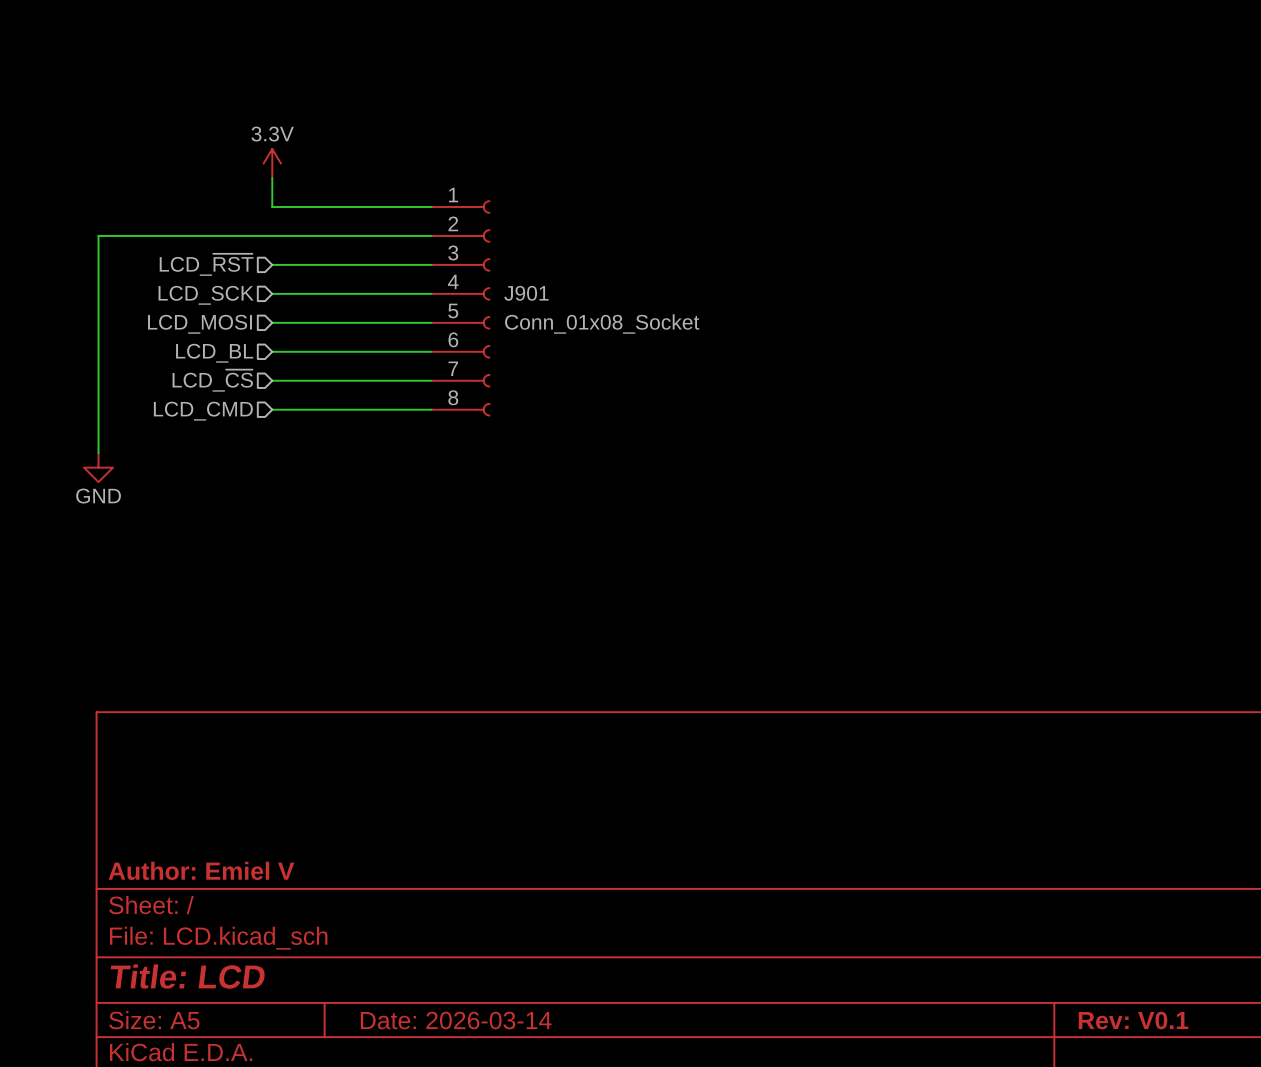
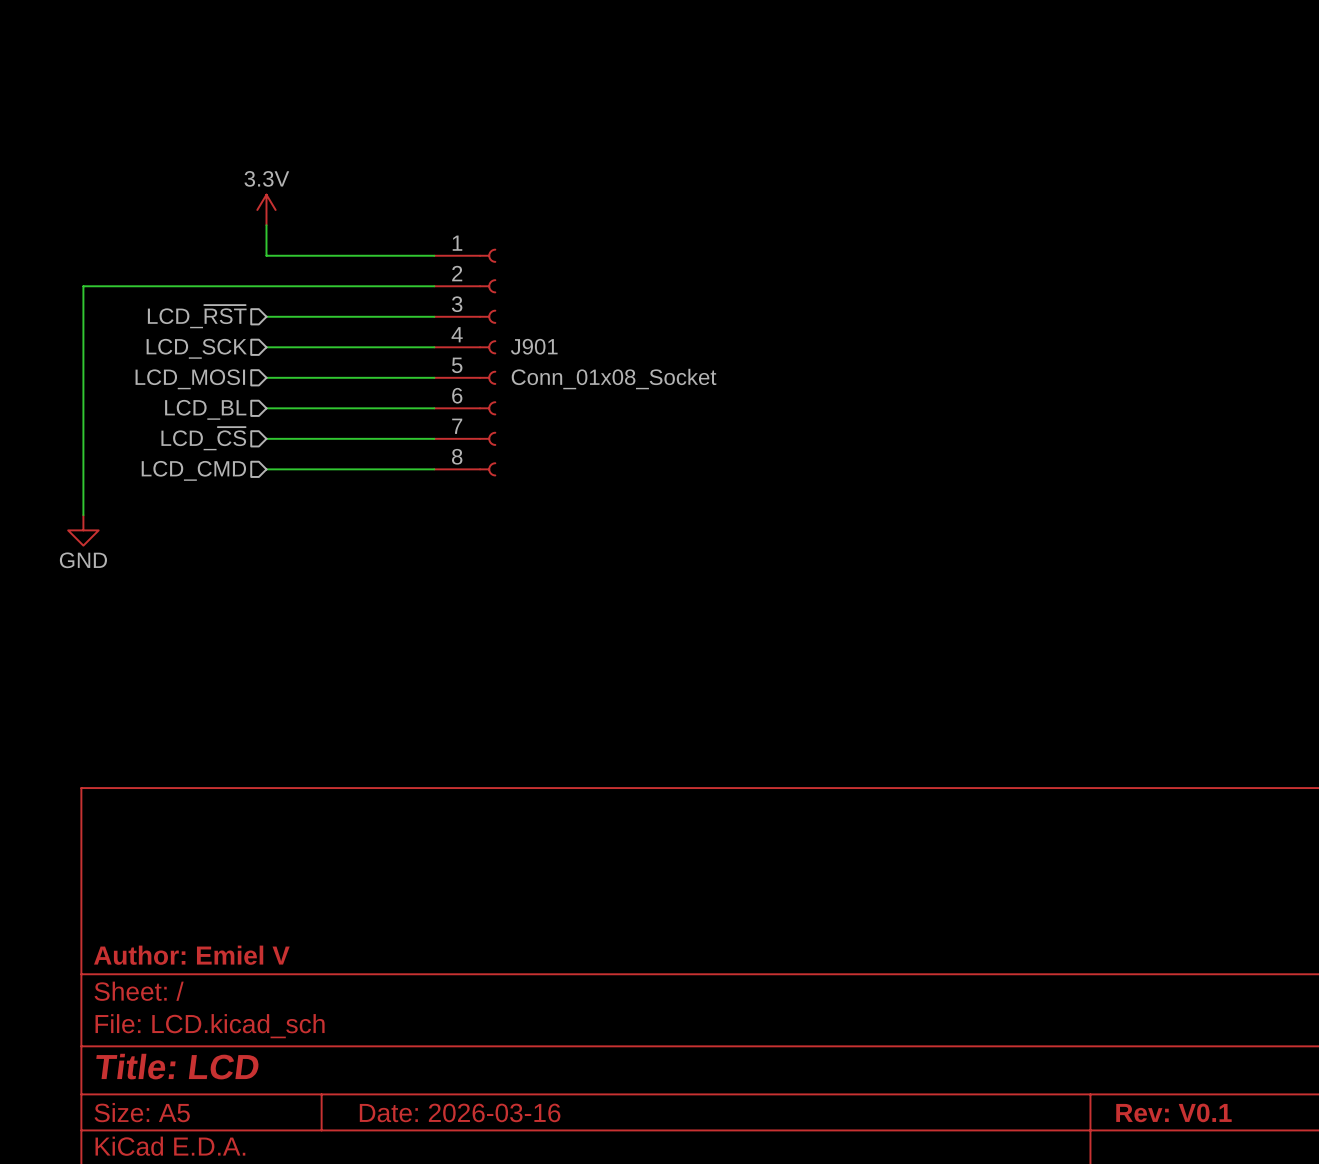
title block: Date: 2026-03-14 (456, 1020) -> Date: 2026-03-16 (460, 1112)

